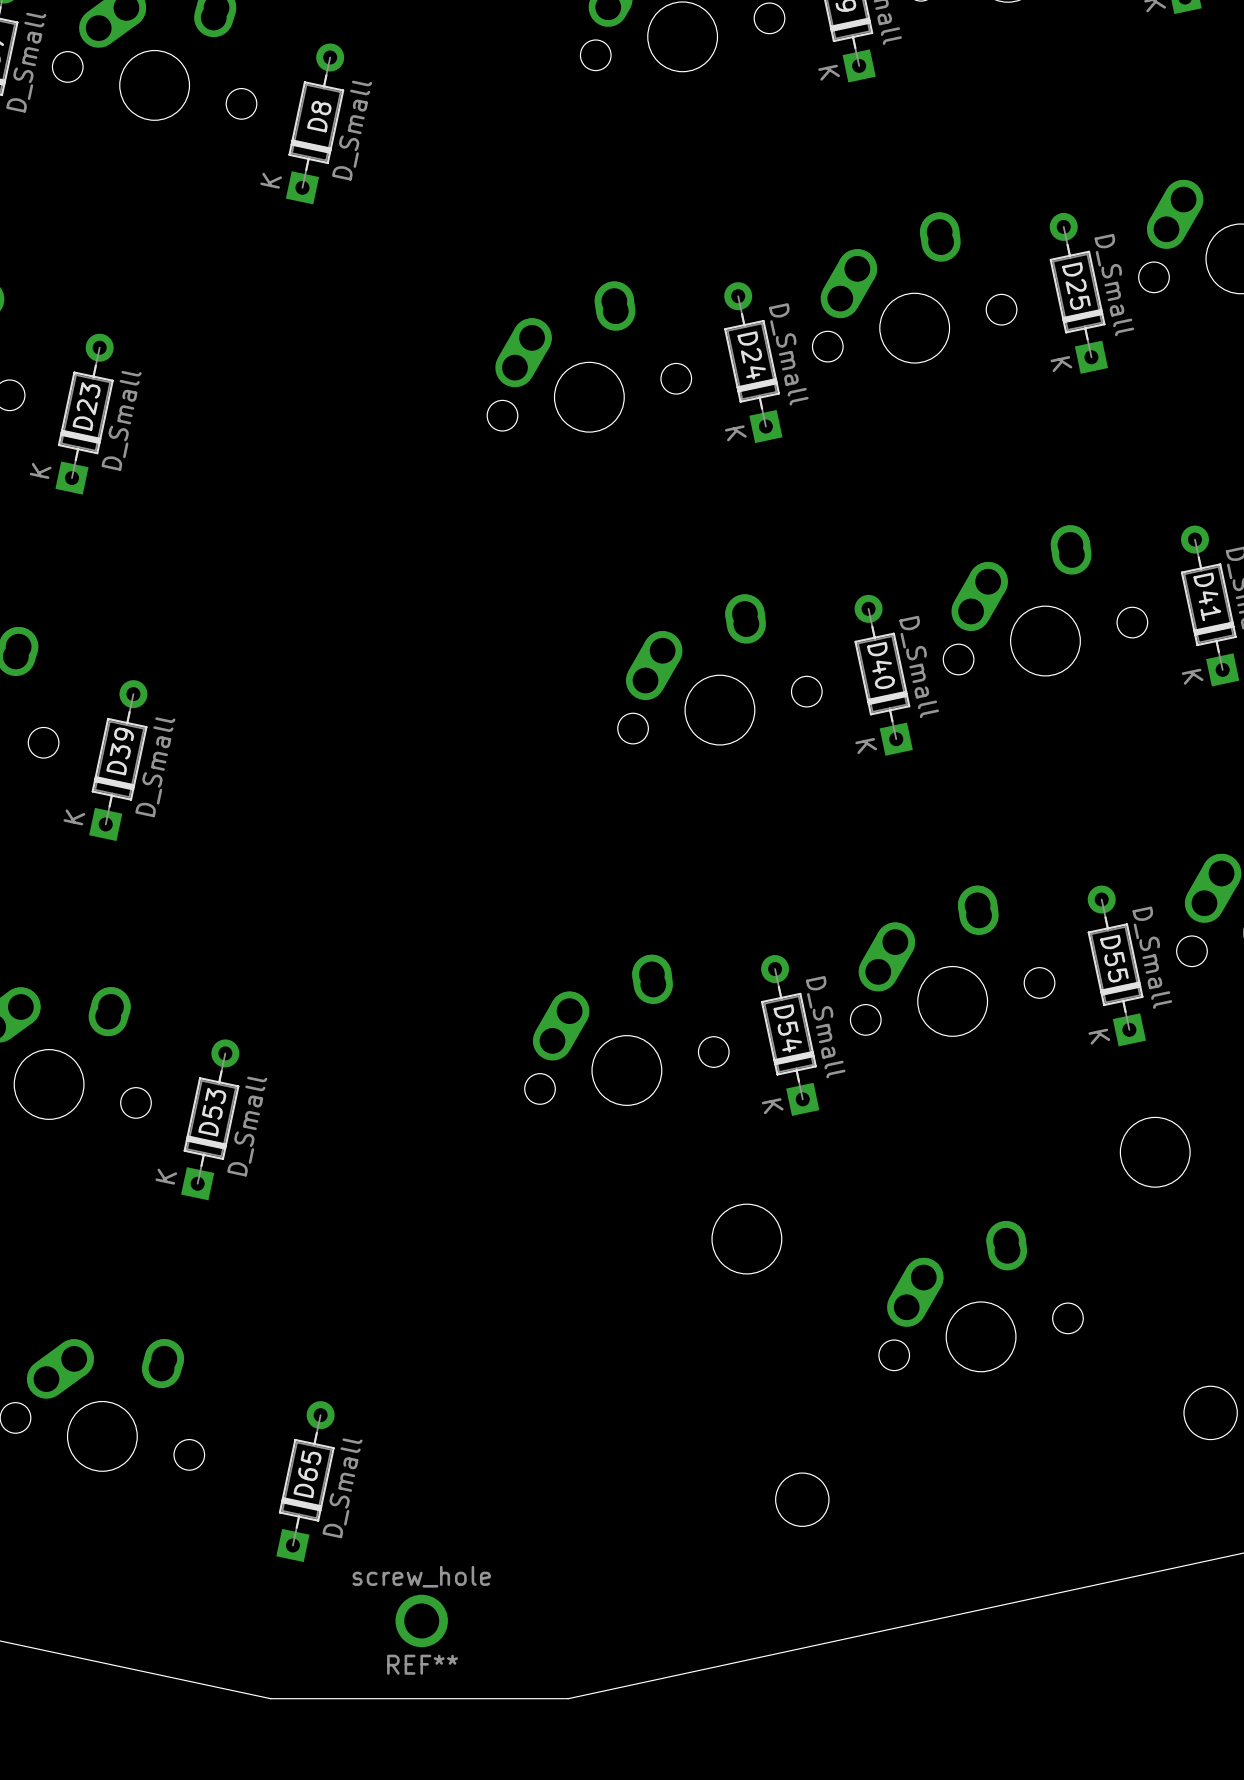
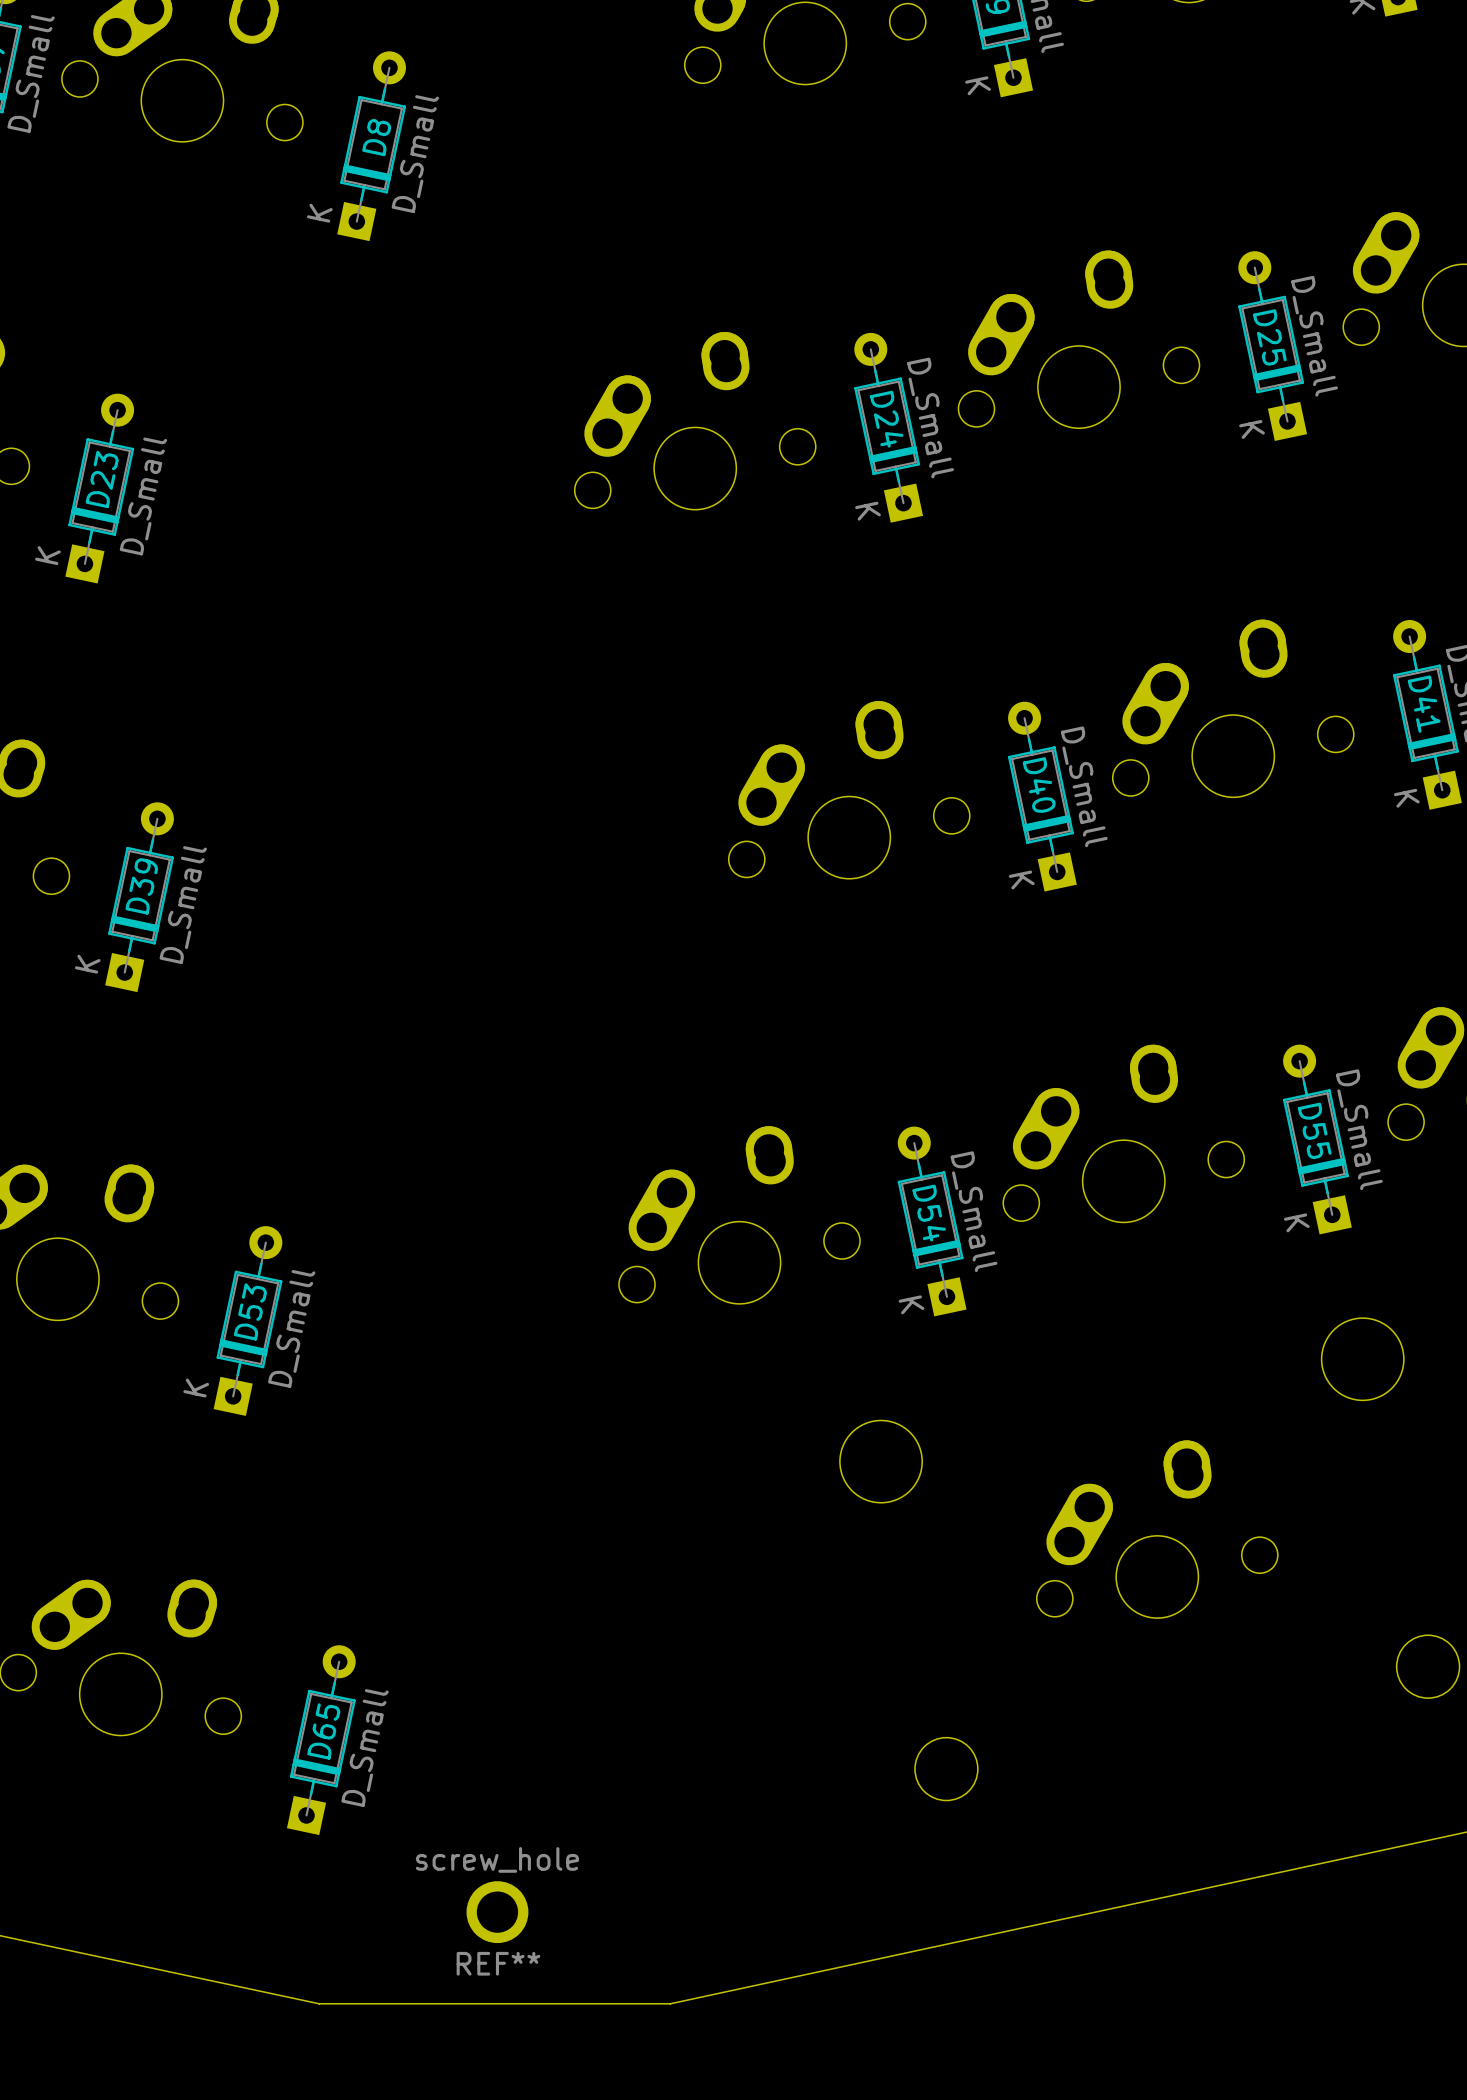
D65 position: (305, 1481) -> (321, 1740)

